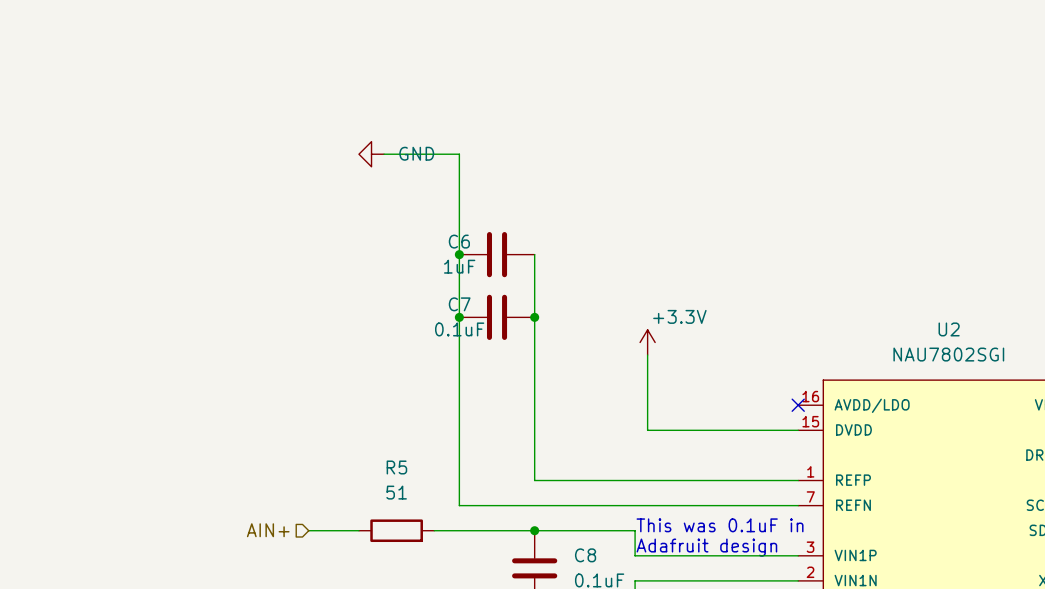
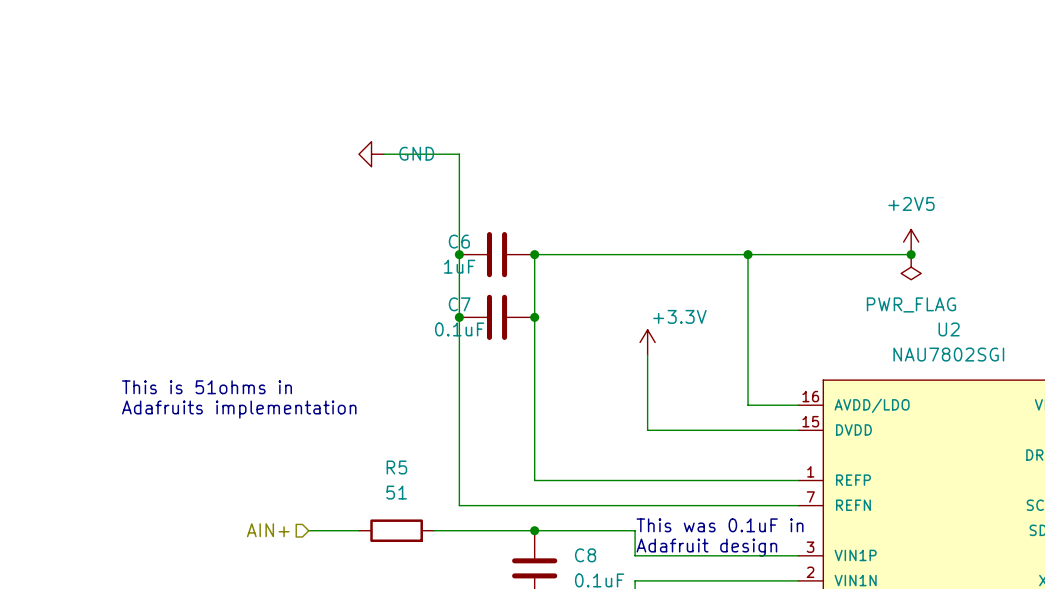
power symbol: none -> +2V5 (911, 242)
wire: none -> (534, 254) (911, 254)
junction: none -> (534, 254)
wire: none -> (748, 254) (748, 405) (798, 405)
junction: none -> (748, 254)
junction: none -> (911, 254)
power symbol: none -> PWR_FLAG (911, 267)
text: none -> This is 51ohms in (206, 387)
no-connect mark: (798, 405) -> none
text: none -> Adafruits implementation (239, 409)

